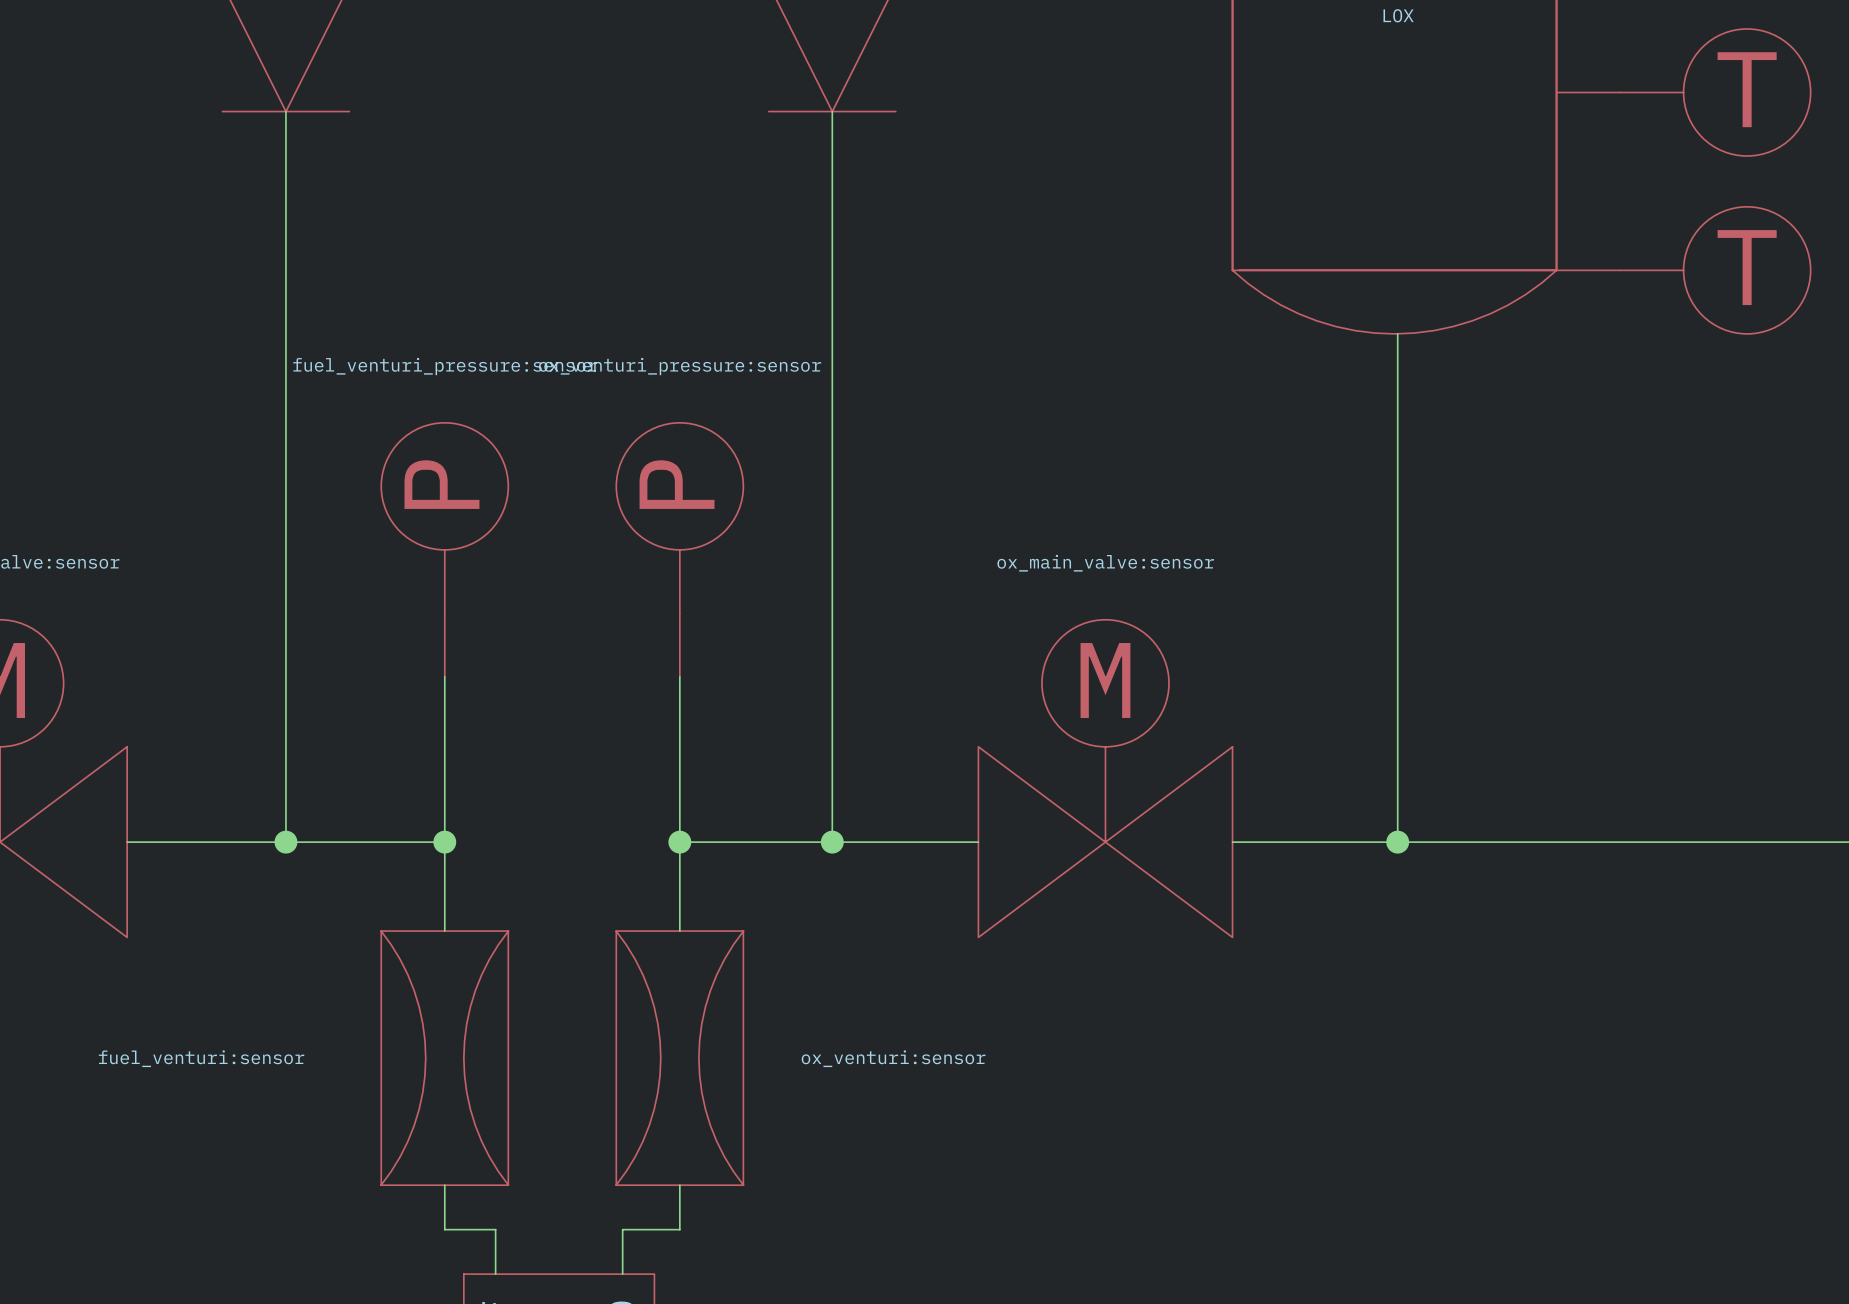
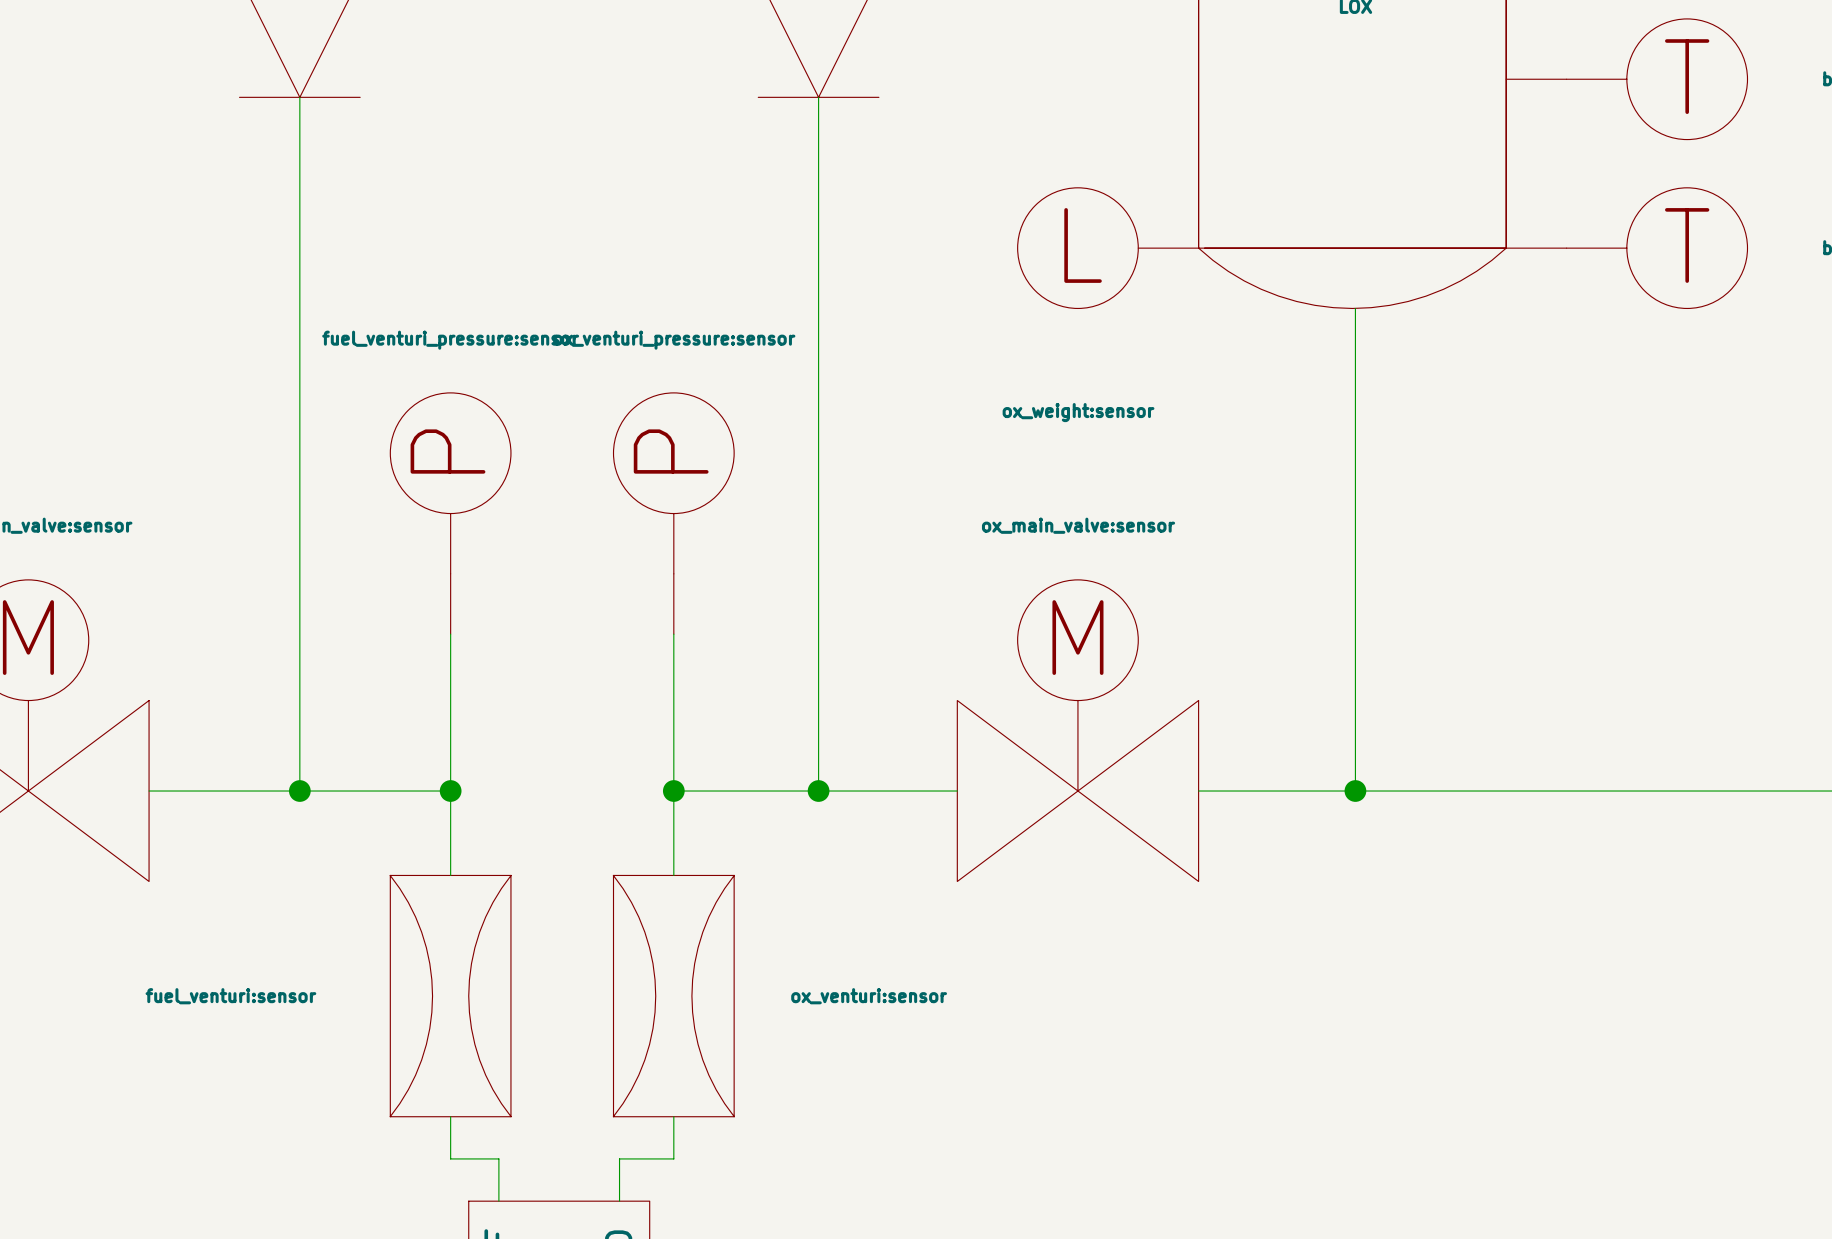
part: none -> ox_weight:sensor (1108, 248)

